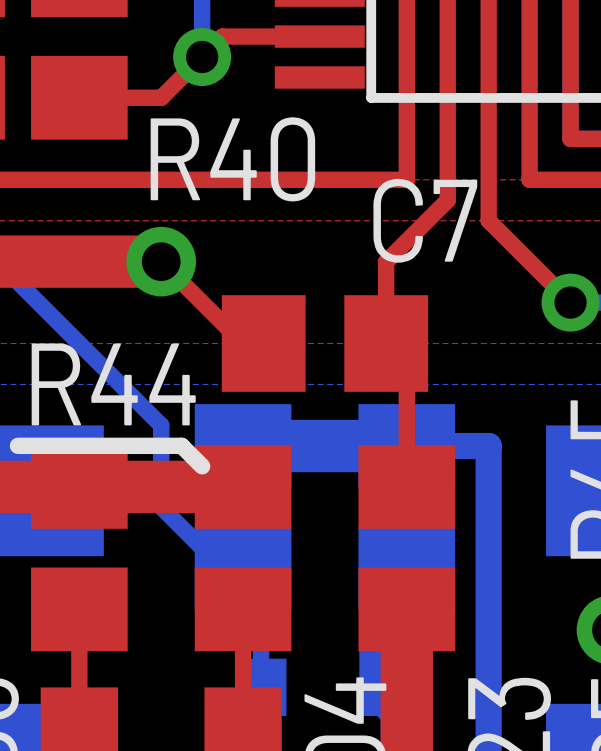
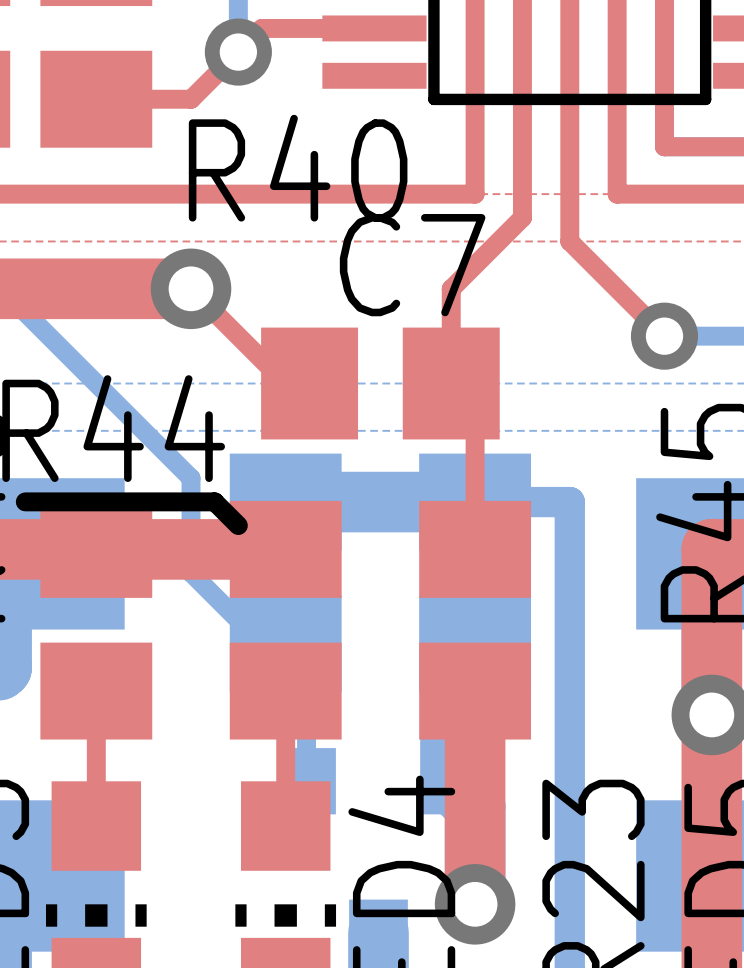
C7 name position: C7 (425, 220) -> C7 (412, 265)

